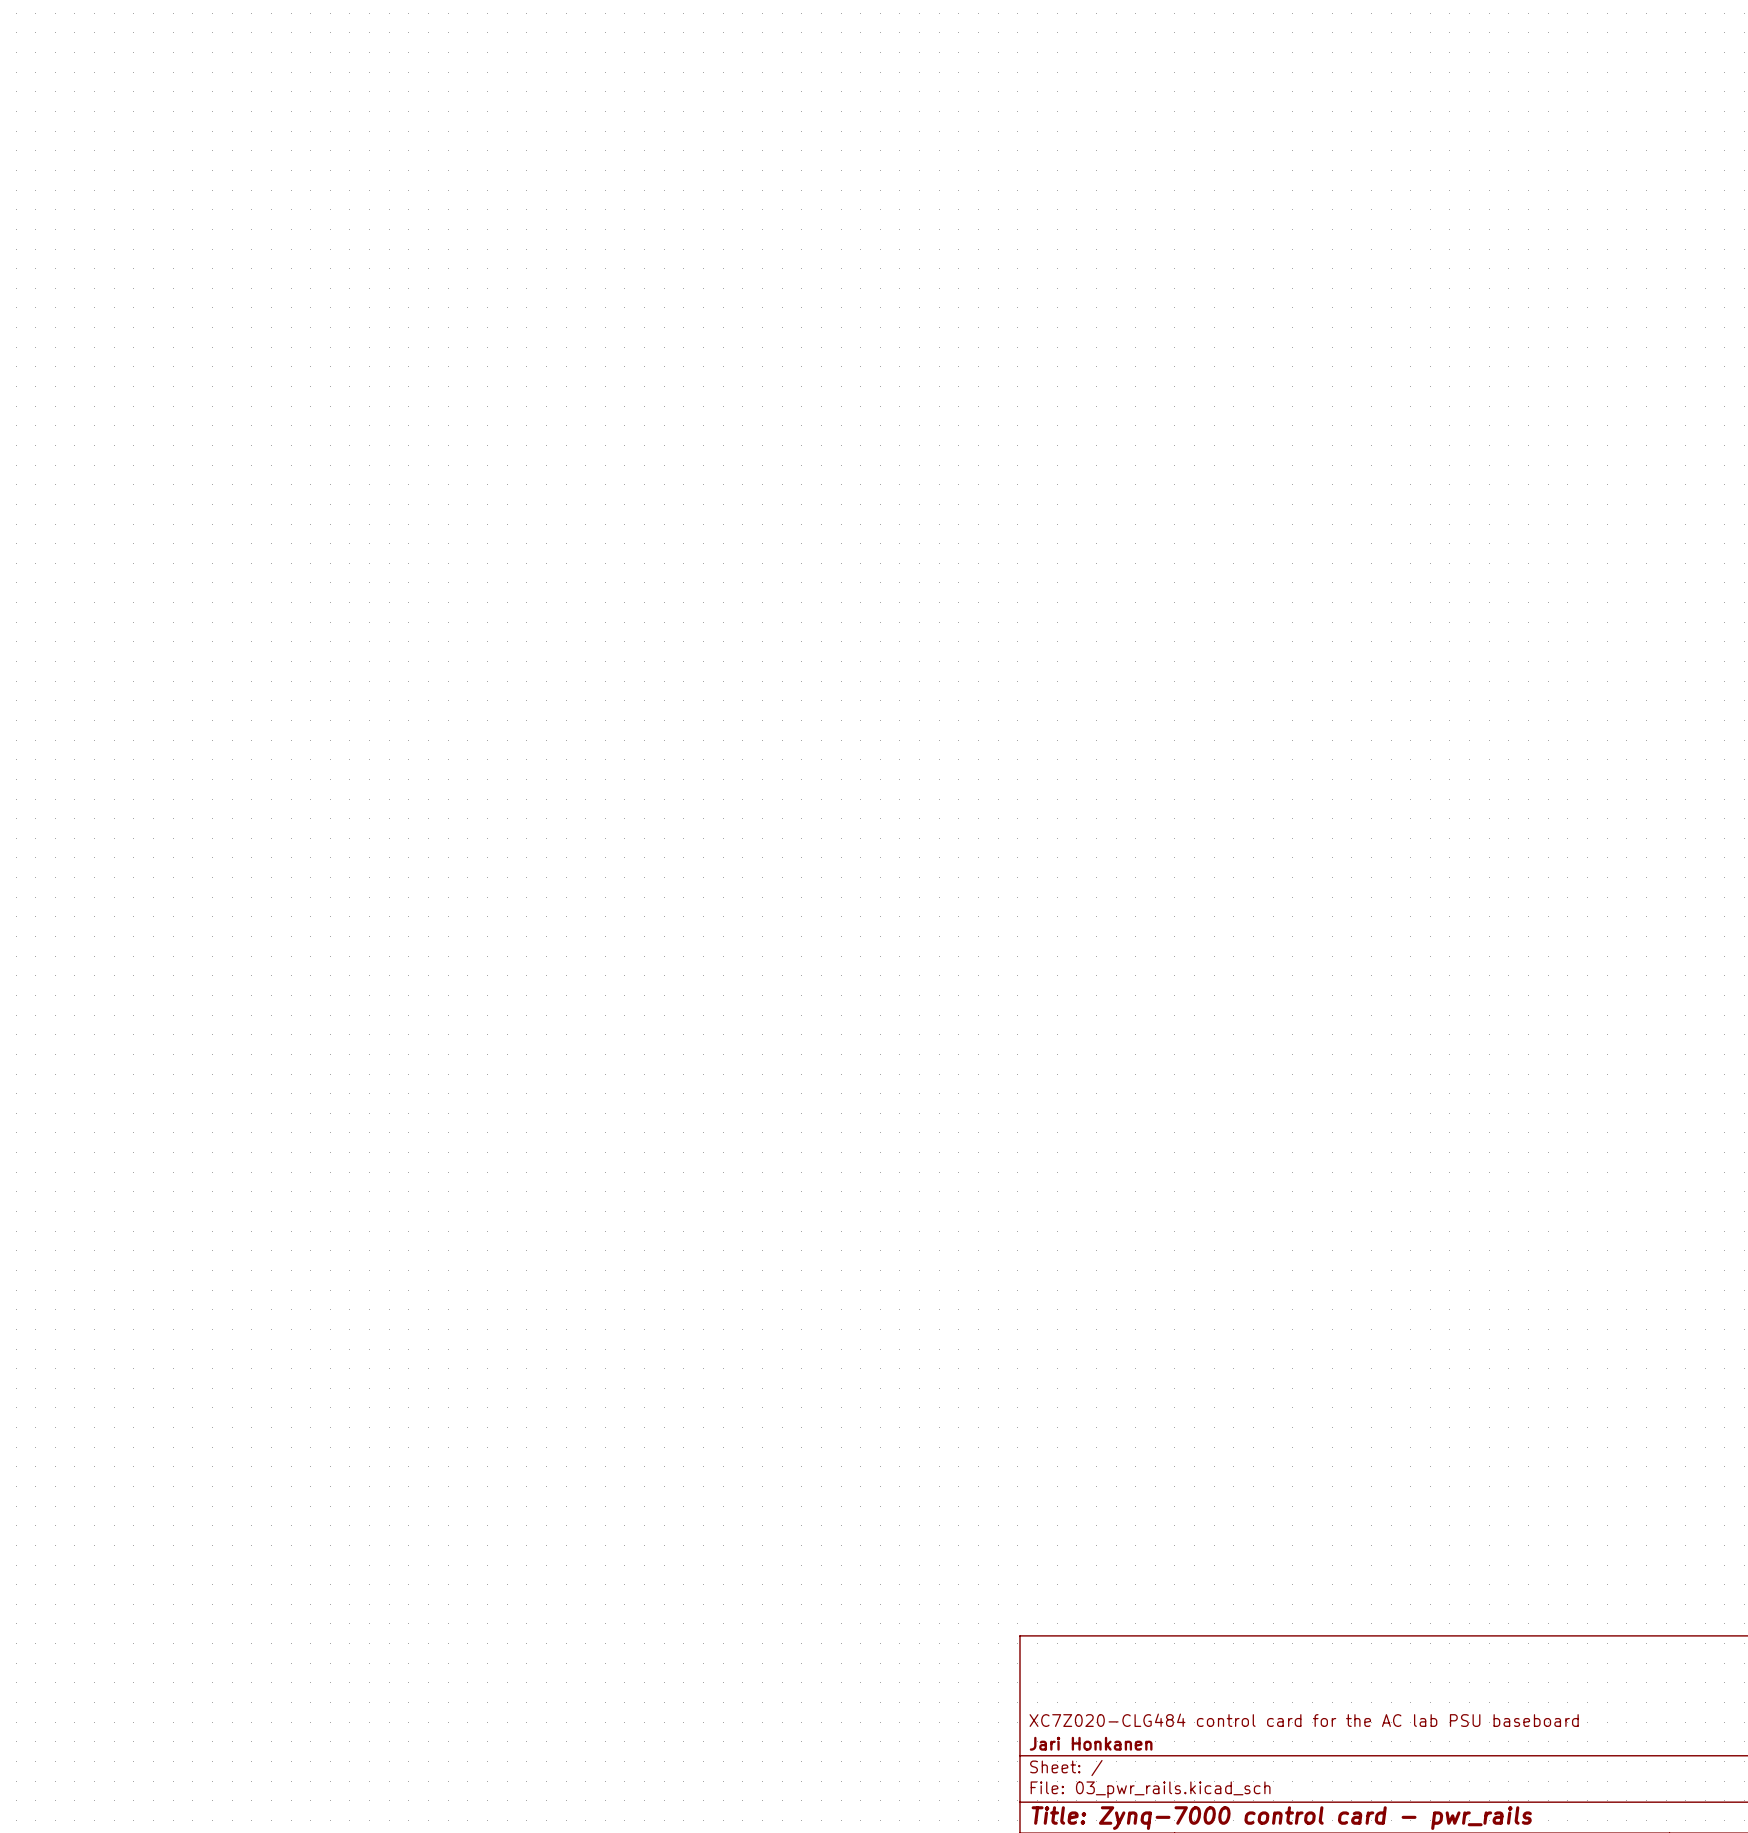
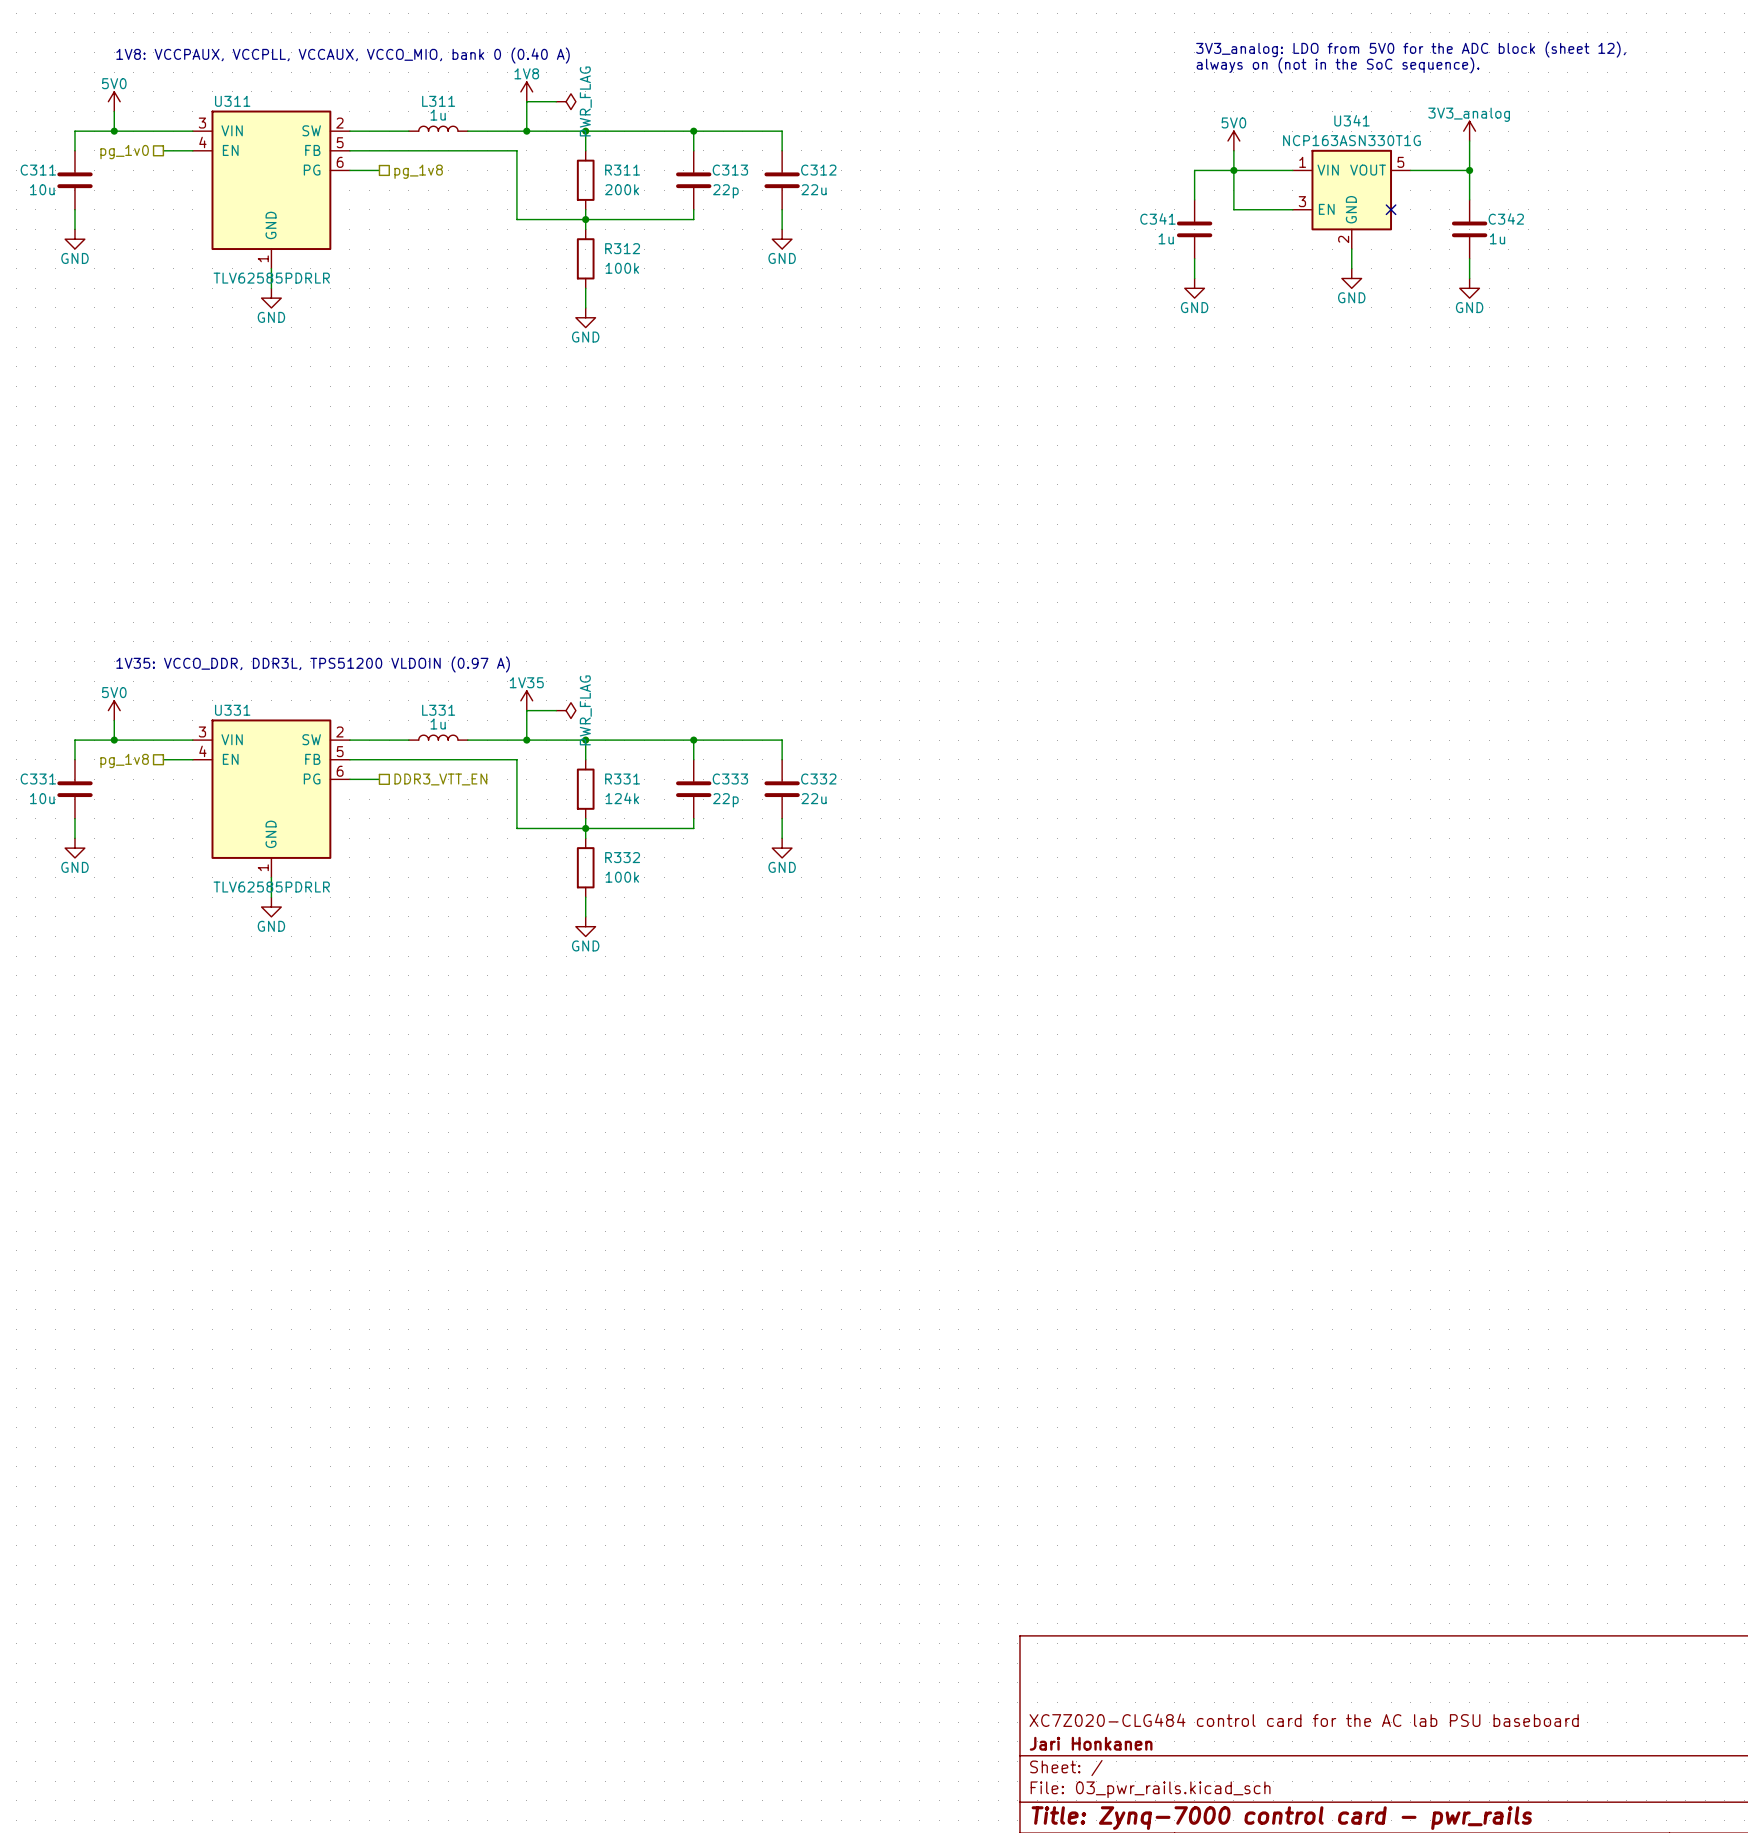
text: none -> 3V3_analog: LDO from 5V0 for the ADC block (sheet 12), (1410, 49)
text: none -> 1V8: VCCPAUX, VCCPLL, VCCAUX, VCCO_MIO, bank 0 (0.40 A) (343, 55)
text: none -> always on (not in the SoC sequence). (1338, 65)
power symbol: none -> 1V8 (526, 91)
power symbol: none -> 5V0 (114, 101)
wire: none -> (556, 101) (526, 101) (526, 131)
power symbol: none -> PWR_FLAG (566, 101)
wire: none -> (114, 111) (114, 131)
L311: none -> 1u (438, 128)
junction: none -> (114, 131)
wire: none -> (192, 131) (74, 131) (74, 150)
wire: none -> (349, 131) (408, 131)
wire: none -> (467, 131) (782, 131) (782, 150)
junction: none -> (526, 131)
wire: none -> (585, 131) (585, 150)
junction: none -> (585, 131)
wire: none -> (693, 131) (693, 150)
junction: none -> (693, 131)
power symbol: none -> 3V3_analog (1469, 131)
power symbol: none -> 5V0 (1233, 140)
wire: none -> (1469, 140) (1469, 199)
wire: none -> (163, 150) (192, 150)
wire: none -> (349, 150) (516, 150) (516, 219) (693, 219) (693, 209)
wire: none -> (1233, 150) (1233, 209) (1292, 209)
hierarchical label: none -> pg_1v0 (124, 152)
wire: none -> (349, 170) (379, 170)
junction: none -> (1233, 170)
wire: none -> (1292, 170) (1194, 170) (1194, 199)
wire: none -> (1410, 170) (1469, 170)
junction: none -> (1469, 170)
hierarchical label: none -> pg_1v8 (418, 171)
C311: none -> 10u (74, 180)
R311: none -> 200k (585, 180)
C313: none -> 22p (693, 180)
C312: none -> 22u (782, 180)
U311: none -> TLV62585PDRLR (271, 189)
U341: none -> NCP163ASN330T1G (1351, 199)
wire: none -> (74, 209) (74, 229)
wire: none -> (585, 209) (585, 229)
wire: none -> (782, 209) (782, 229)
no-connect mark: none -> (1391, 209)
junction: none -> (585, 219)
C341: none -> 1u (1194, 229)
C342: none -> 1u (1469, 229)
power symbol: none -> GND (74, 239)
power symbol: none -> GND (782, 239)
wire: none -> (1351, 249) (1351, 268)
R312: none -> 100k (585, 258)
wire: none -> (1194, 258) (1194, 278)
wire: none -> (1469, 258) (1469, 278)
wire: none -> (271, 268) (271, 288)
power symbol: none -> GND (1351, 278)
wire: none -> (585, 288) (585, 307)
power symbol: none -> GND (1194, 288)
power symbol: none -> GND (1469, 288)
power symbol: none -> GND (271, 298)
power symbol: none -> GND (585, 317)
text: none -> 1V35: VCCO_DDR, DDR3L, TPS51200 VLDOIN (0.97 A) (313, 664)
power symbol: none -> 1V35 (526, 700)
power symbol: none -> 5V0 (114, 710)
wire: none -> (556, 710) (526, 710) (526, 740)
power symbol: none -> PWR_FLAG (566, 710)
wire: none -> (114, 720) (114, 740)
L331: none -> 1u (438, 737)
junction: none -> (114, 740)
wire: none -> (192, 740) (74, 740) (74, 759)
wire: none -> (349, 740) (408, 740)
wire: none -> (467, 740) (782, 740) (782, 759)
junction: none -> (526, 740)
wire: none -> (585, 740) (585, 759)
junction: none -> (585, 740)
wire: none -> (693, 740) (693, 759)
junction: none -> (693, 740)
wire: none -> (163, 759) (192, 759)
wire: none -> (349, 759) (516, 759) (516, 828) (693, 828) (693, 818)
hierarchical label: none -> pg_1v8 (124, 760)
wire: none -> (349, 779) (379, 779)
hierarchical label: none -> DDR3_VTT_EN (440, 779)
C331: none -> 10u (74, 789)
R331: none -> 124k (585, 789)
C333: none -> 22p (693, 789)
C332: none -> 22u (782, 789)
U331: none -> TLV62585PDRLR (271, 798)
wire: none -> (74, 818) (74, 838)
wire: none -> (585, 818) (585, 838)
wire: none -> (782, 818) (782, 838)
junction: none -> (585, 828)
power symbol: none -> GND (74, 848)
power symbol: none -> GND (782, 848)
R332: none -> 100k (585, 867)
wire: none -> (271, 877) (271, 897)
wire: none -> (585, 897) (585, 916)
power symbol: none -> GND (271, 907)
power symbol: none -> GND (585, 926)

